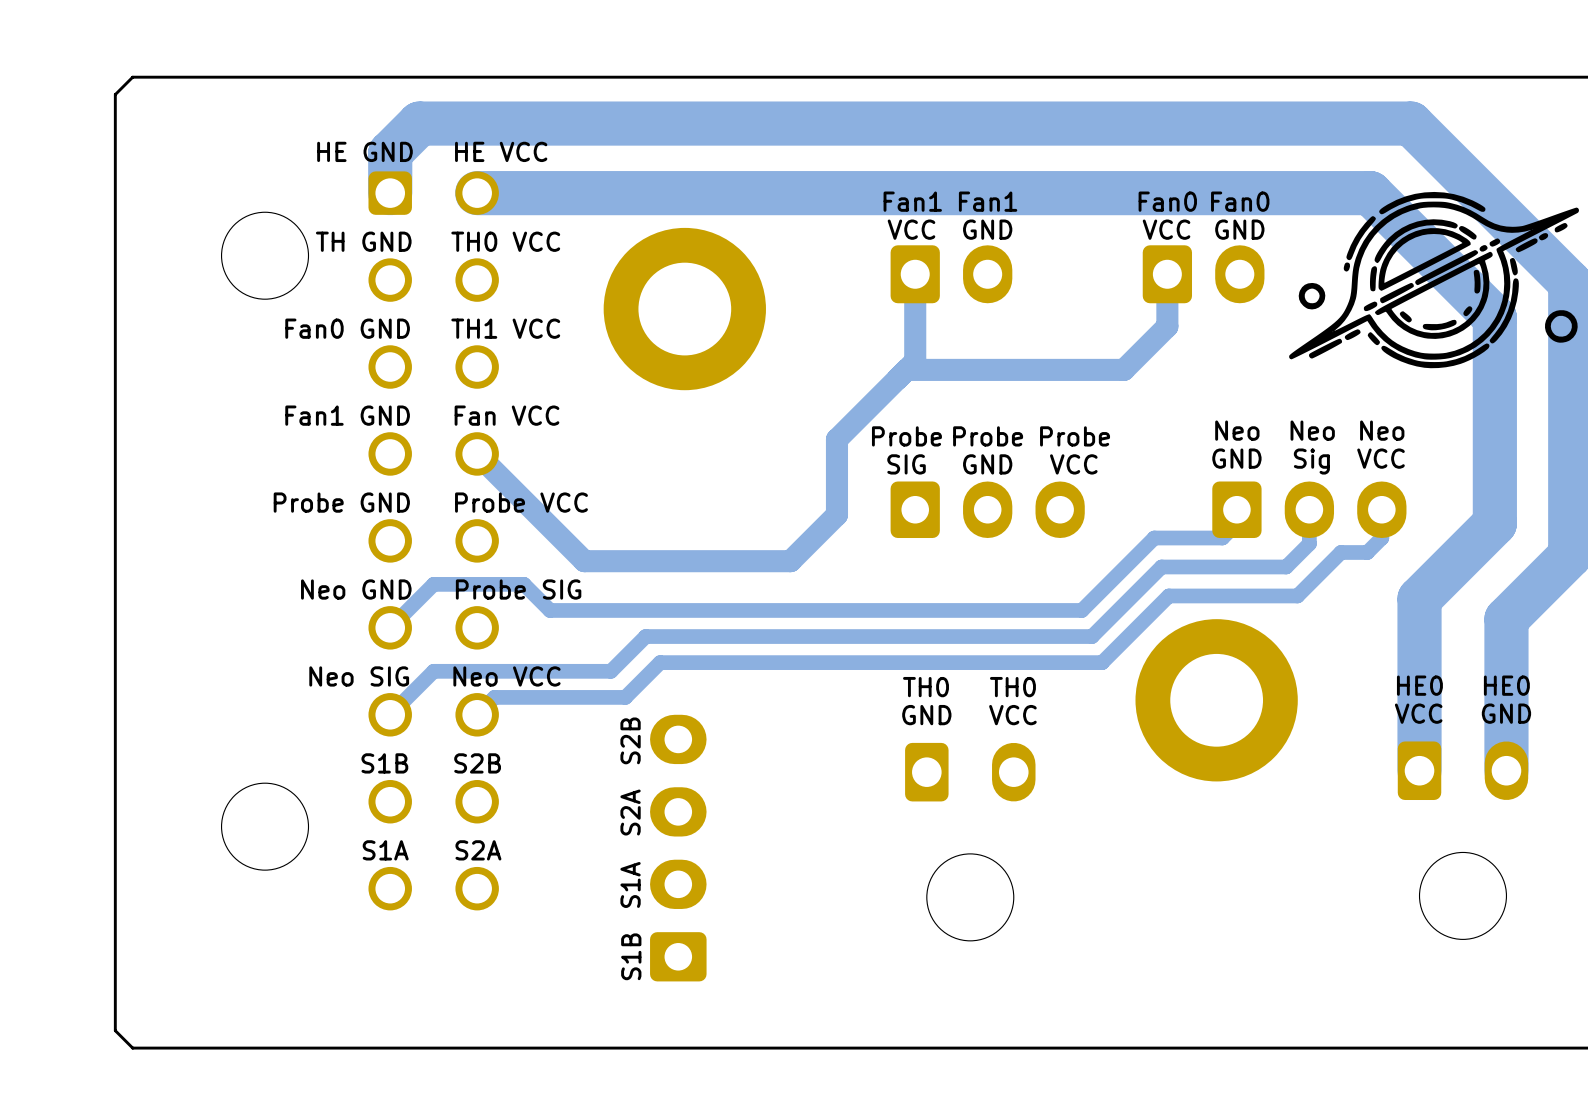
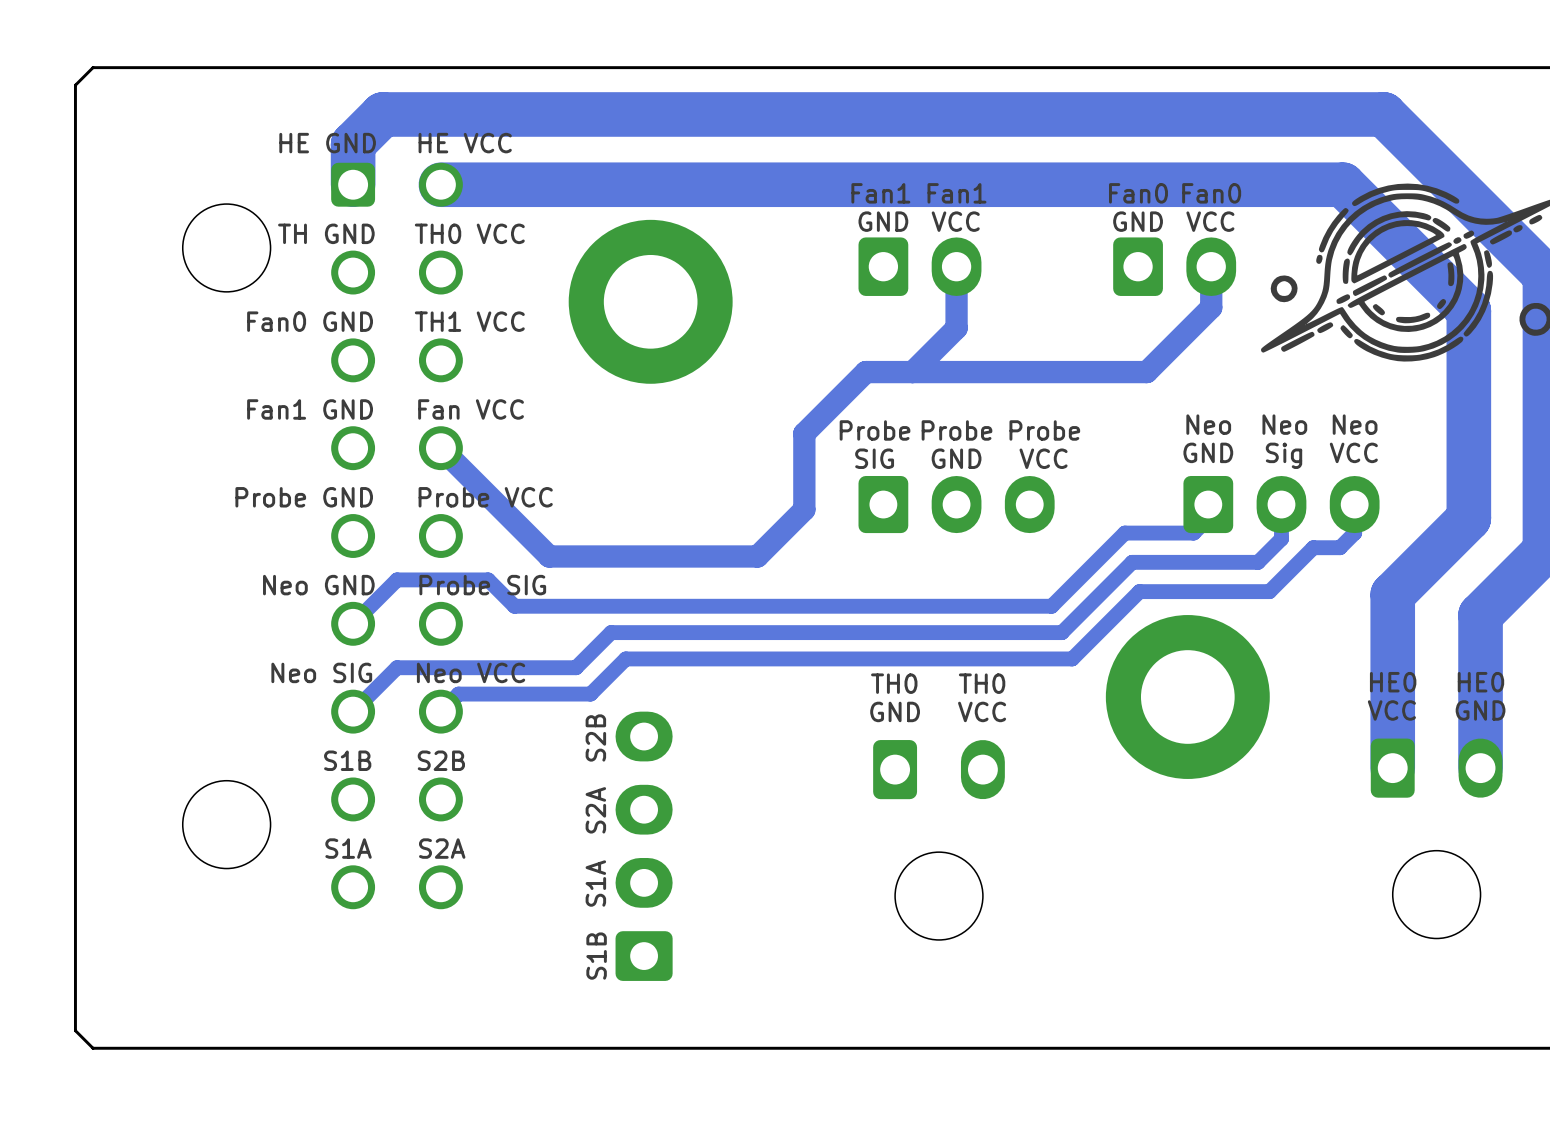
text: VCC (911, 229) -> GND (883, 221)
text: GND (987, 229) -> VCC (955, 221)
text: VCC (1166, 229) -> GND (1138, 221)
text: GND (1239, 229) -> VCC (1210, 221)
track: (915, 274) (915, 361) (897, 378) -> (1211, 266) (1211, 307) (1146, 372) (865, 372)
track: none -> (956, 266) (956, 328) (912, 372)
track: (1167, 274) (1167, 326) (1123, 369) (906, 369) -> none

